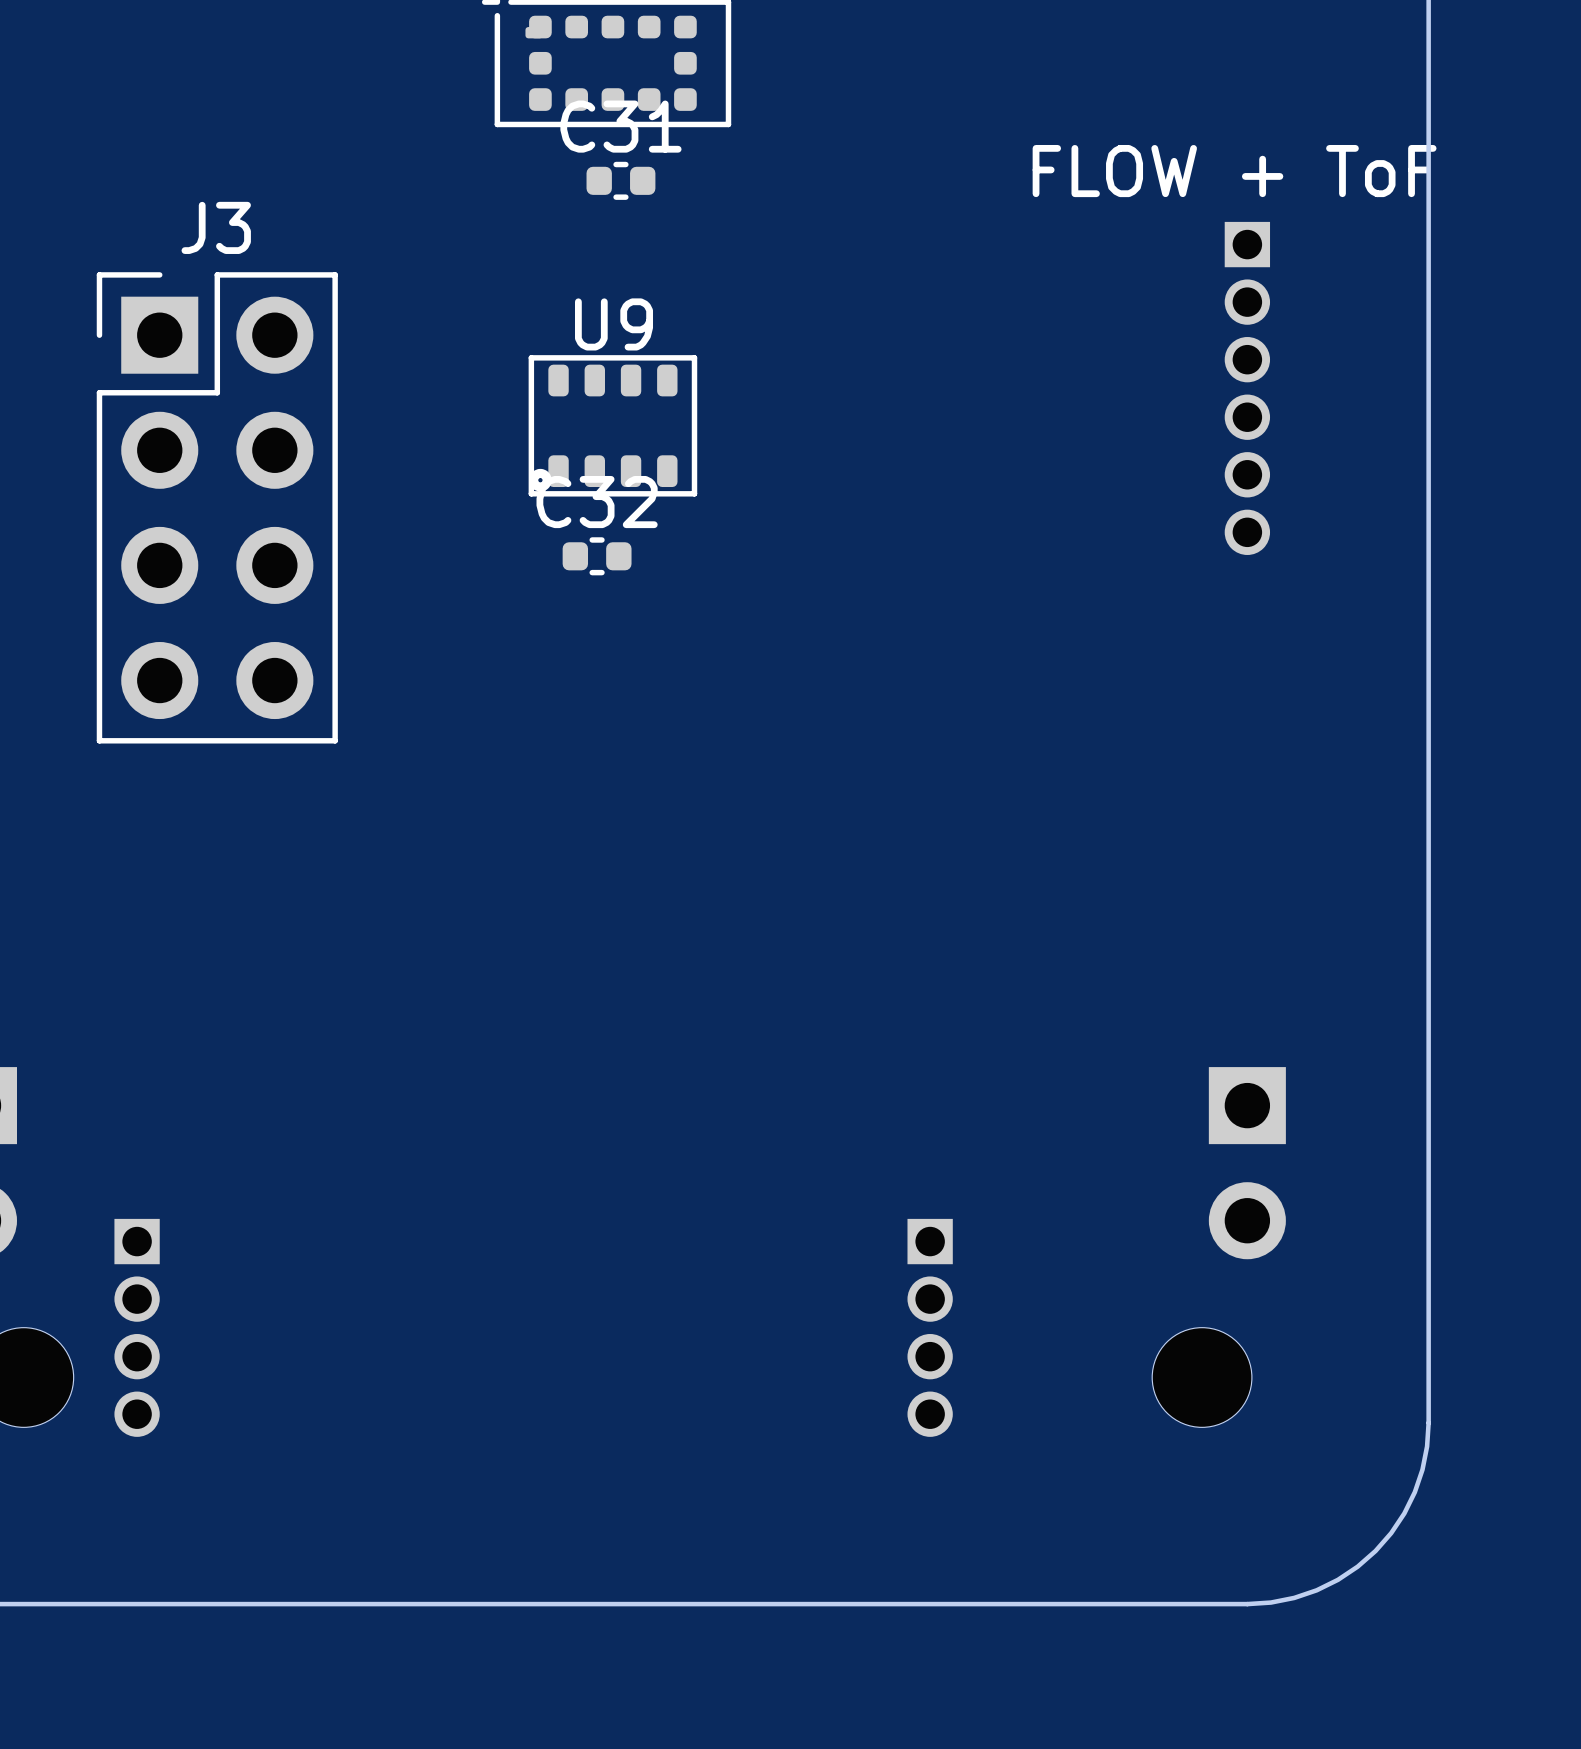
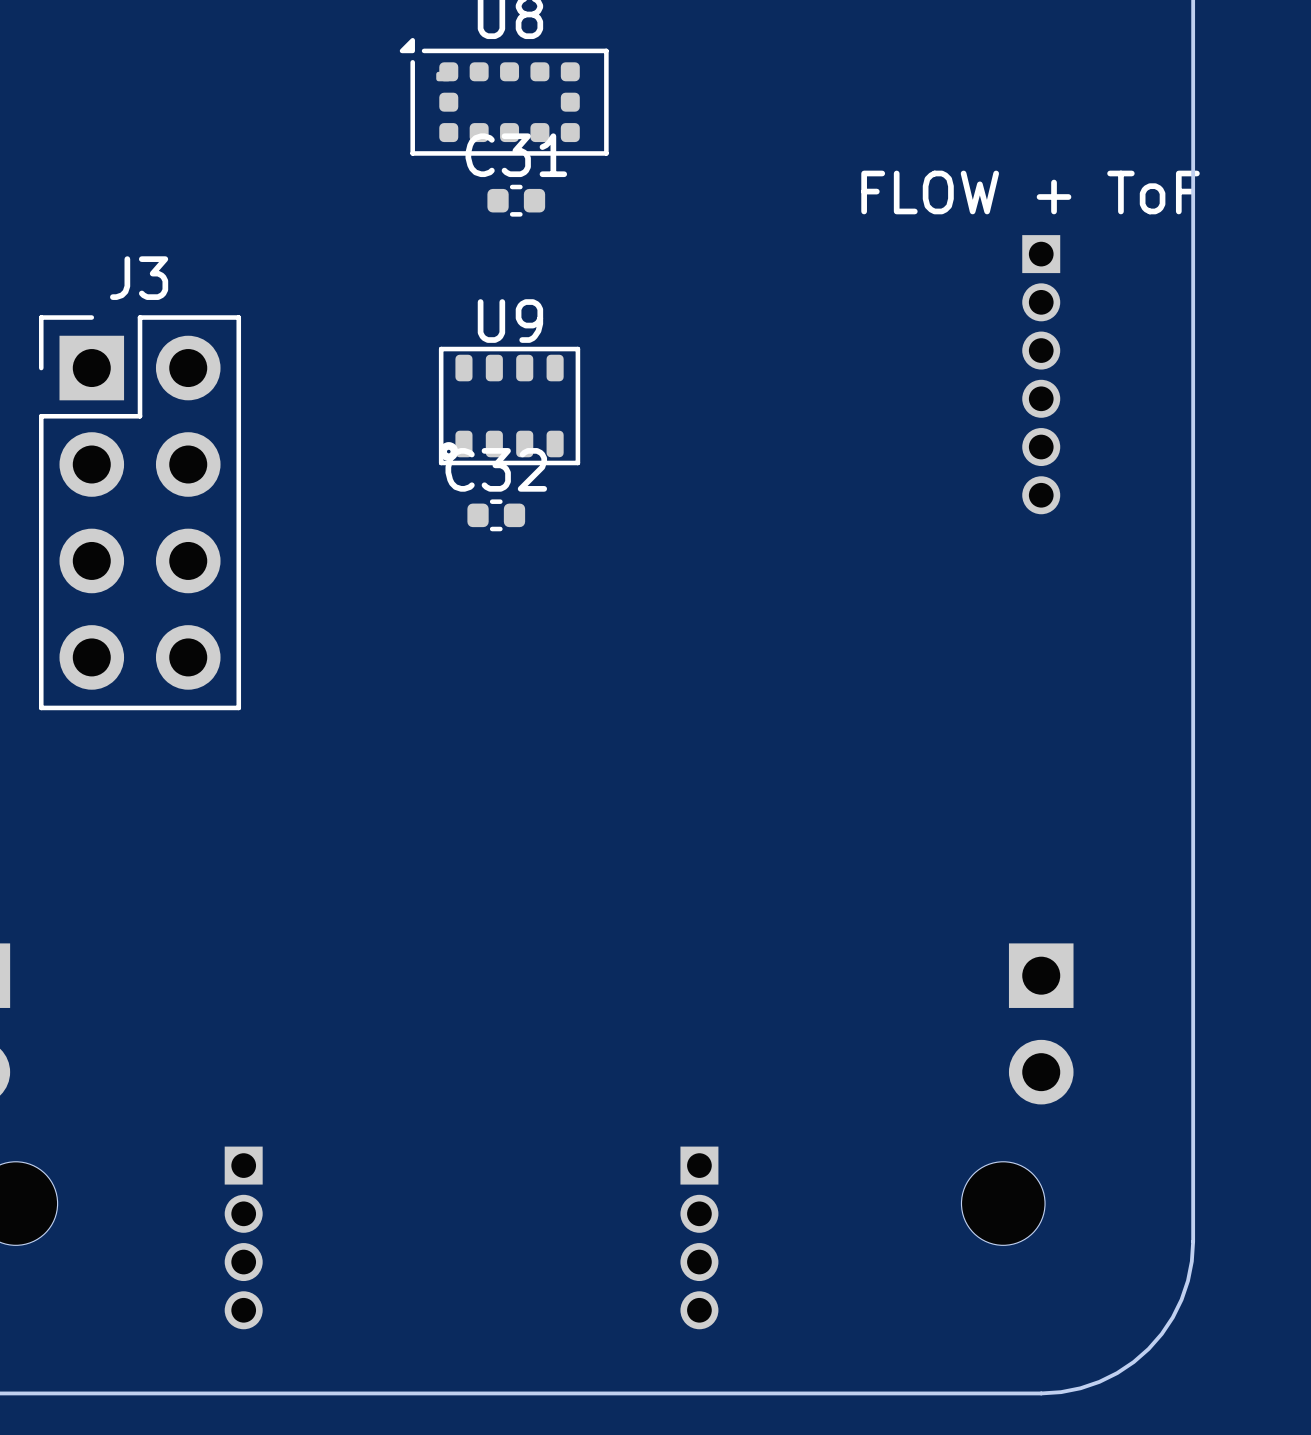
J3 position: (217, 507) -> (140, 512)
part position: (137, 1327) -> (243, 1237)
part position: (930, 1327) -> (699, 1237)

